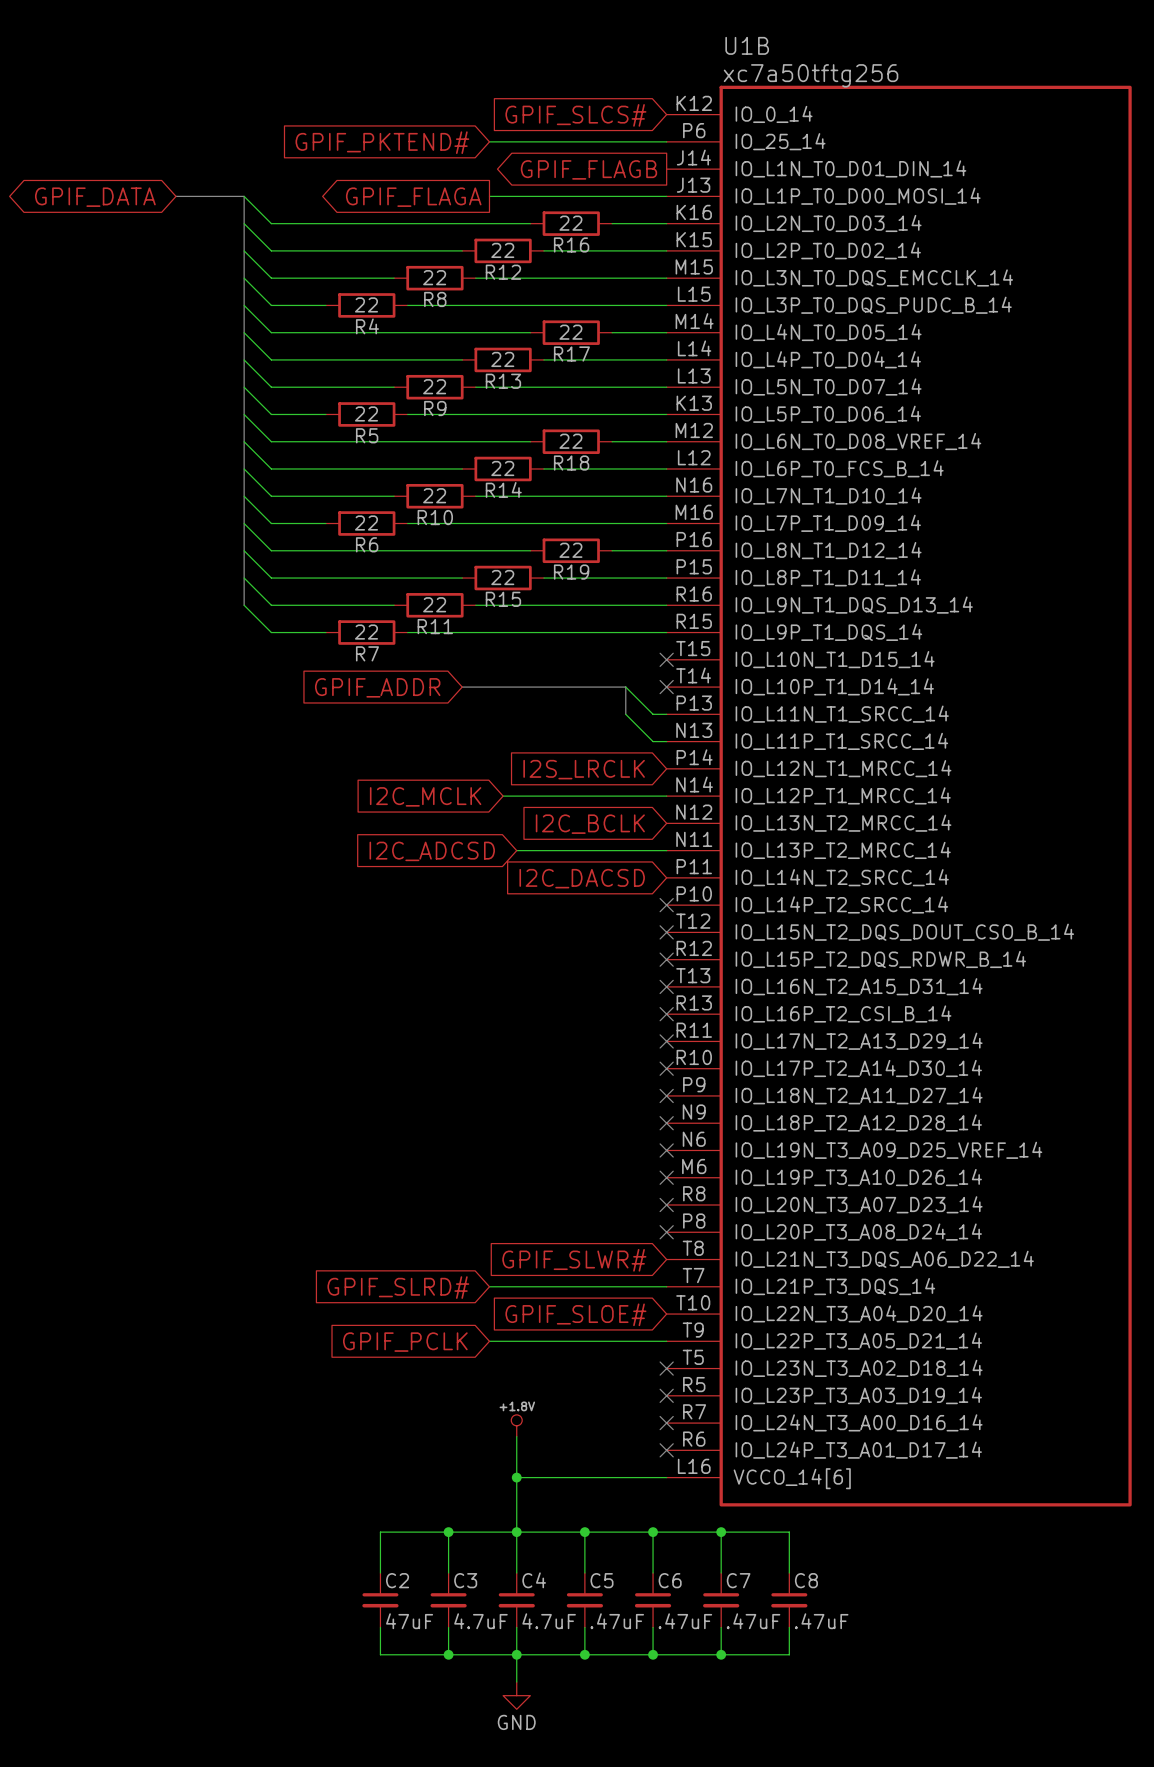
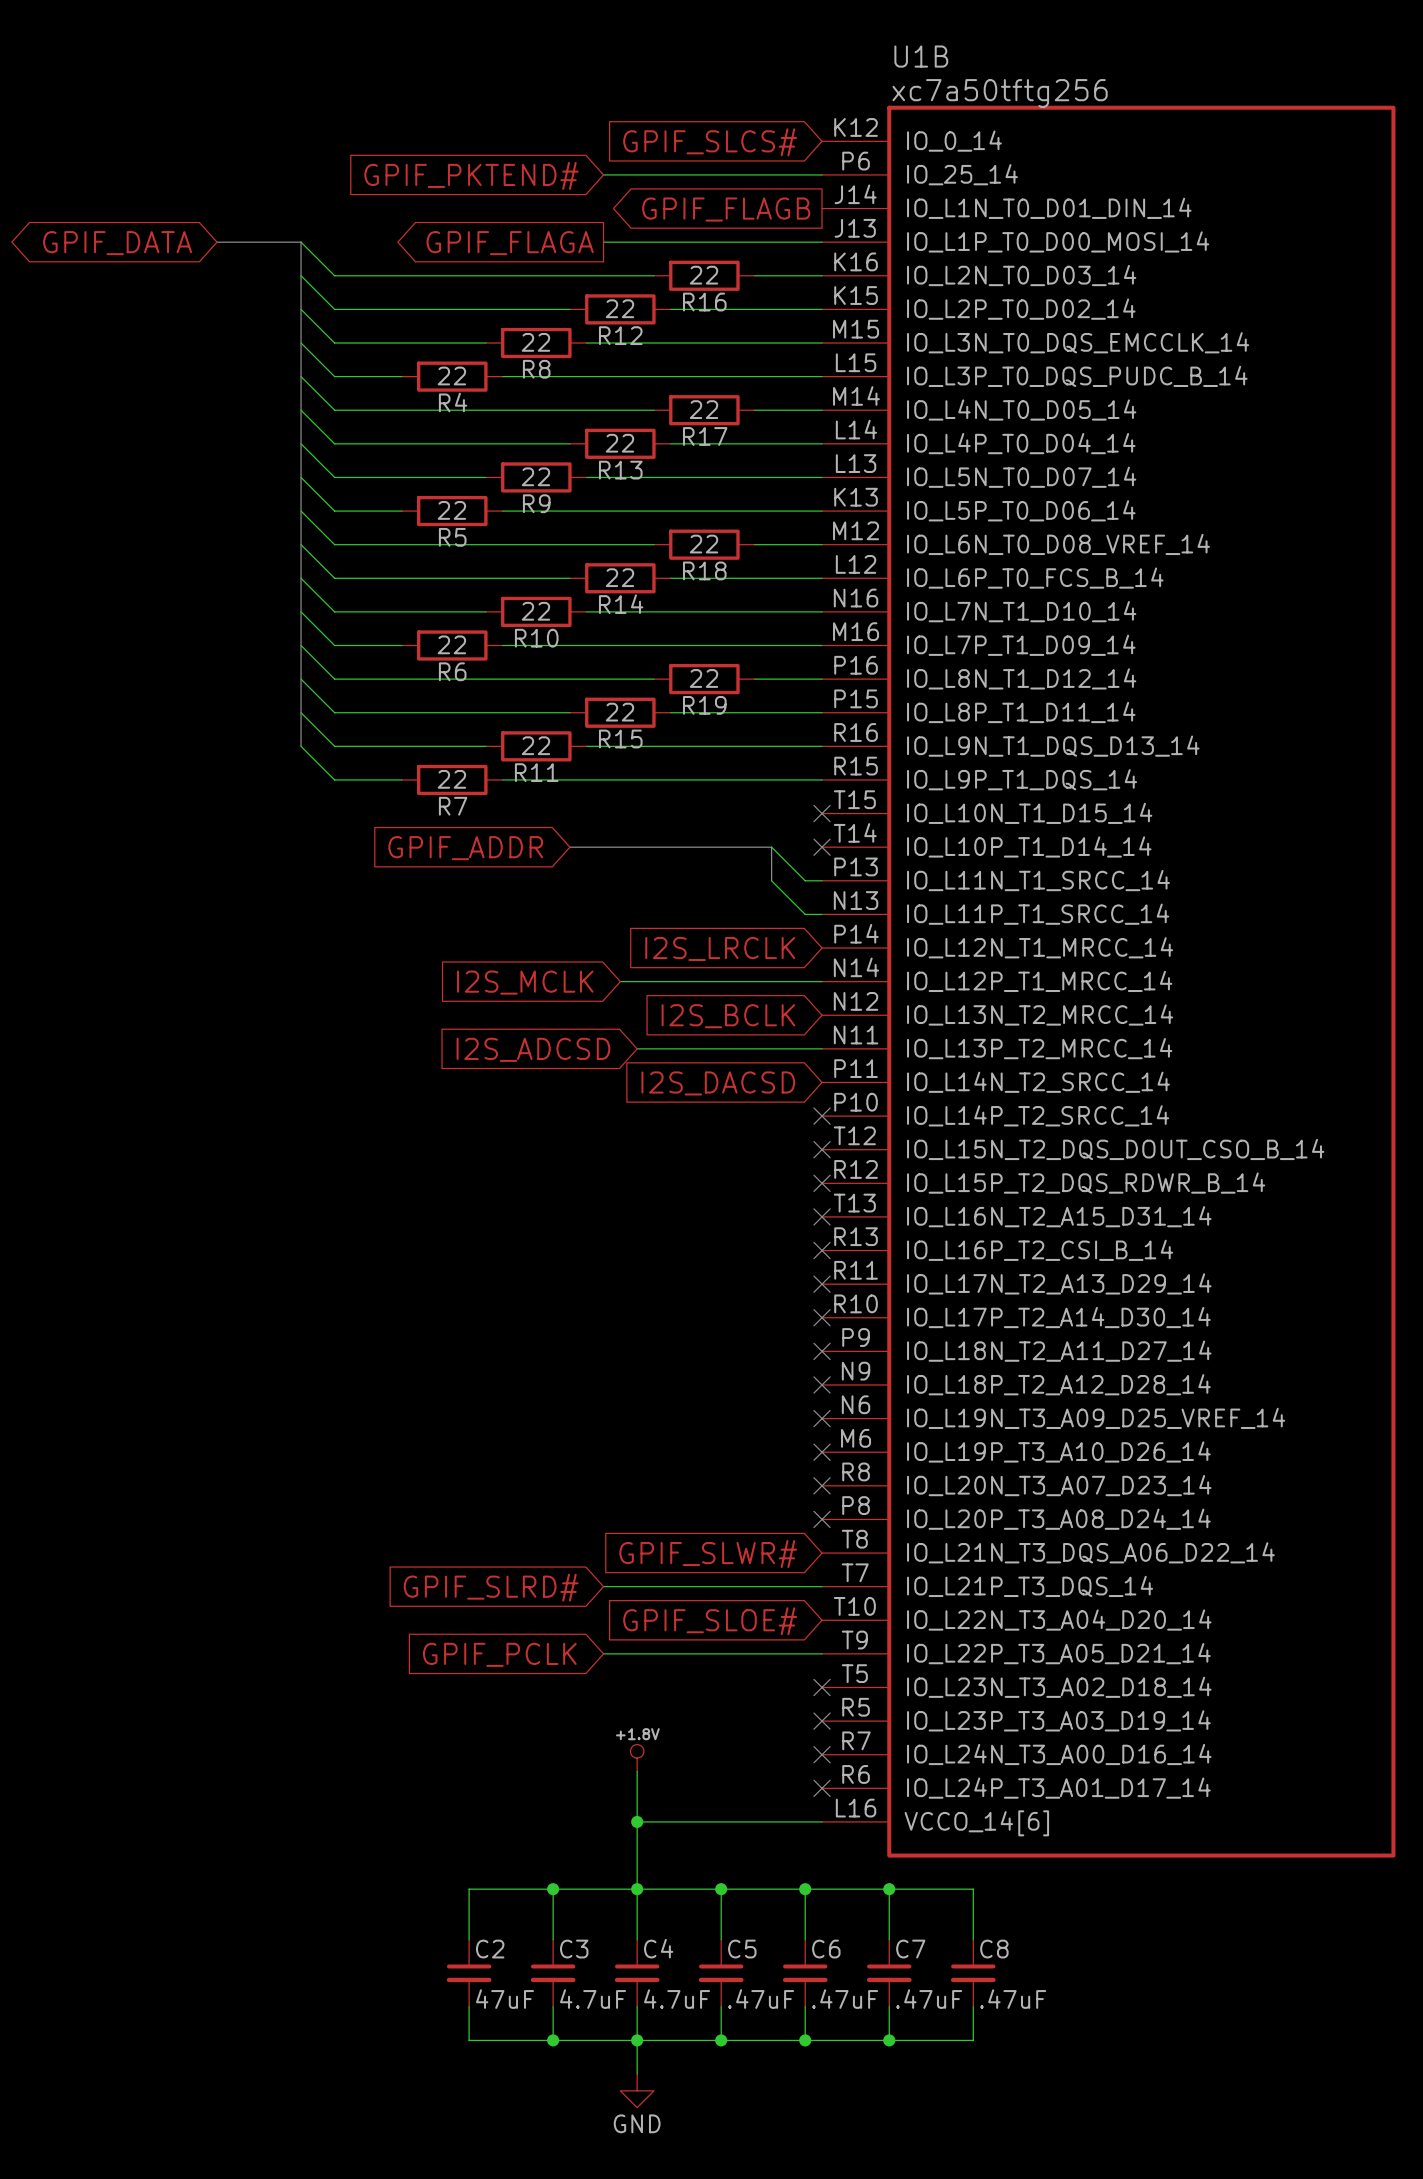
global label: I2C_MCLK (425, 796) -> I2S_MCLK (525, 982)
global label: I2C_BCLK (590, 824) -> I2S_BCLK (728, 1016)
global label: I2C_ADCSD (432, 851) -> I2S_ADCSD (533, 1049)
global label: I2C_DACSD (582, 878) -> I2S_DACSD (718, 1083)

